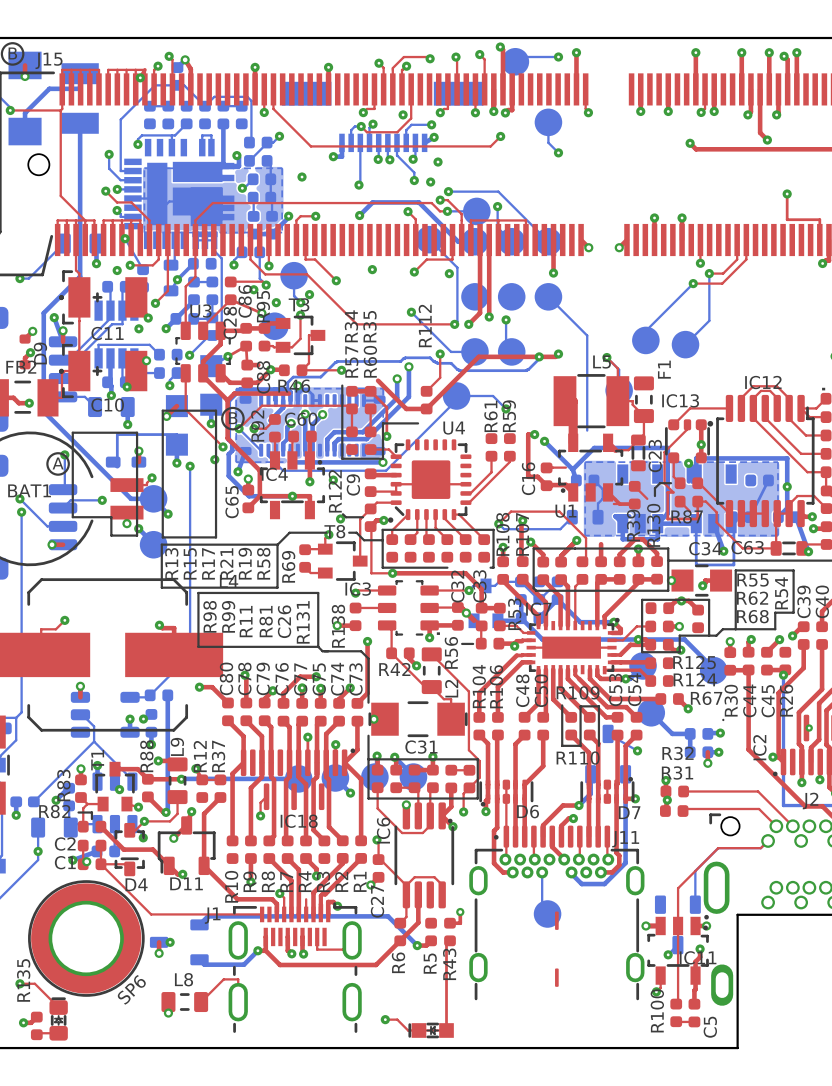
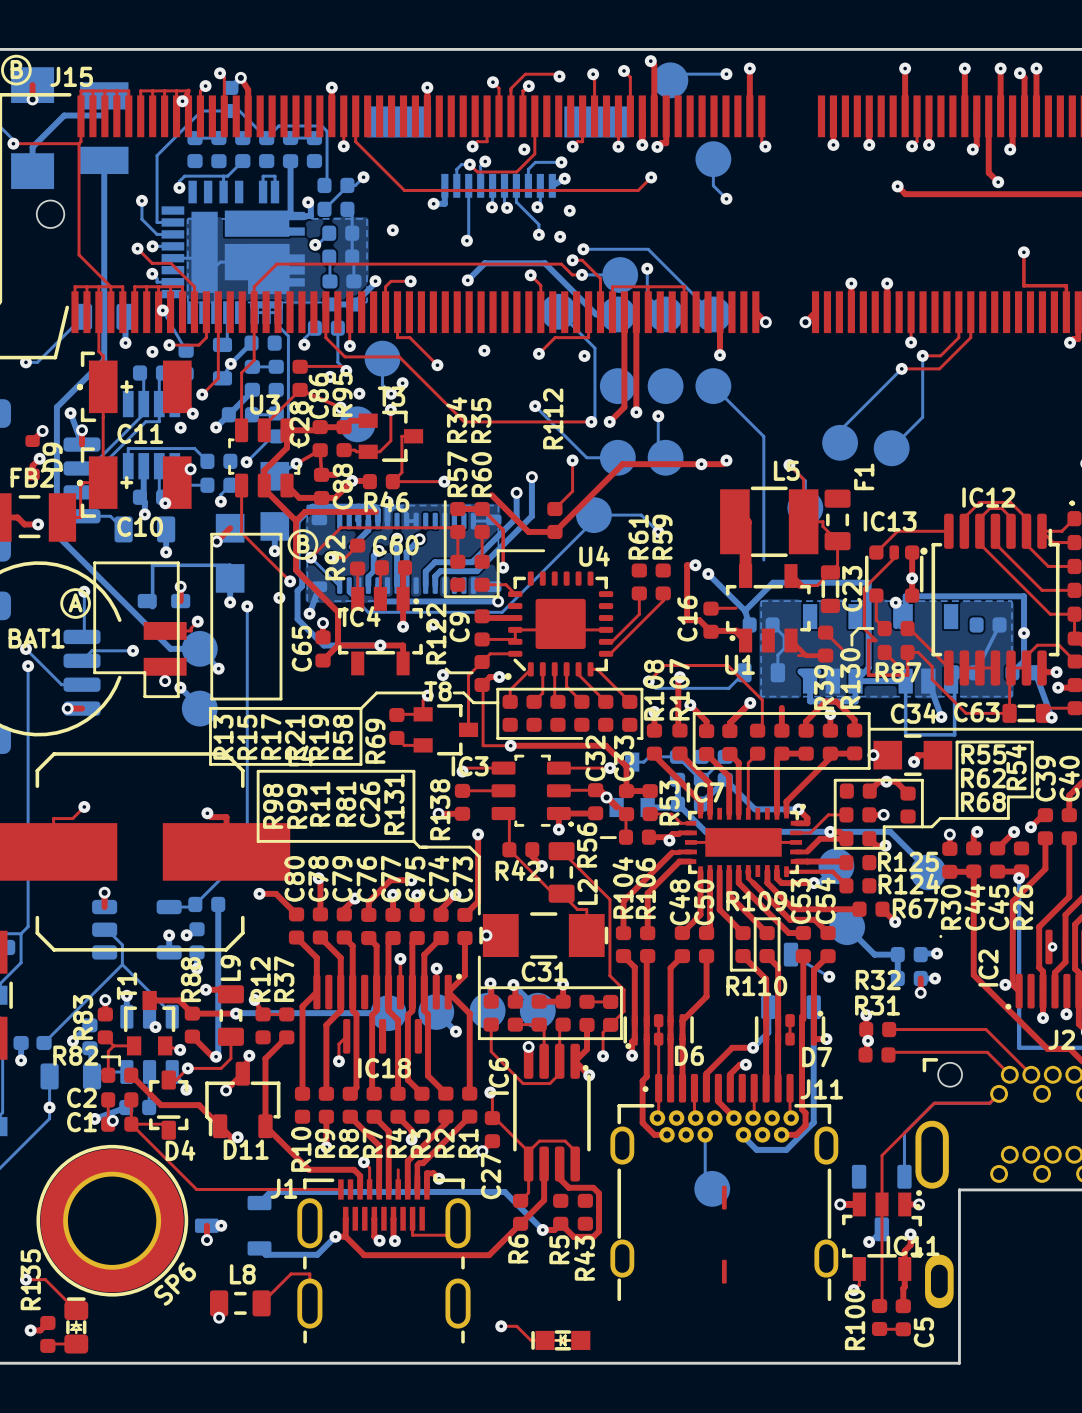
bottom track: (539, 356) (526, 370) (459, 370) (451, 363) (437, 363) (430, 357) (405, 357) (400, 361) (337, 361) (320, 377) (293, 377) (287, 382) (287, 389) -> none
top track: none -> (559, 1178) (568, 1187) (593, 1187) (599, 1193) (599, 1231) (593, 1236) (573, 1236) (560, 1223) (558, 1226)
top track: (460, 912) (460, 923) (450, 923) -> none
via: (460, 912) -> none
top track: (450, 940) (446, 944) (446, 1030) -> none

